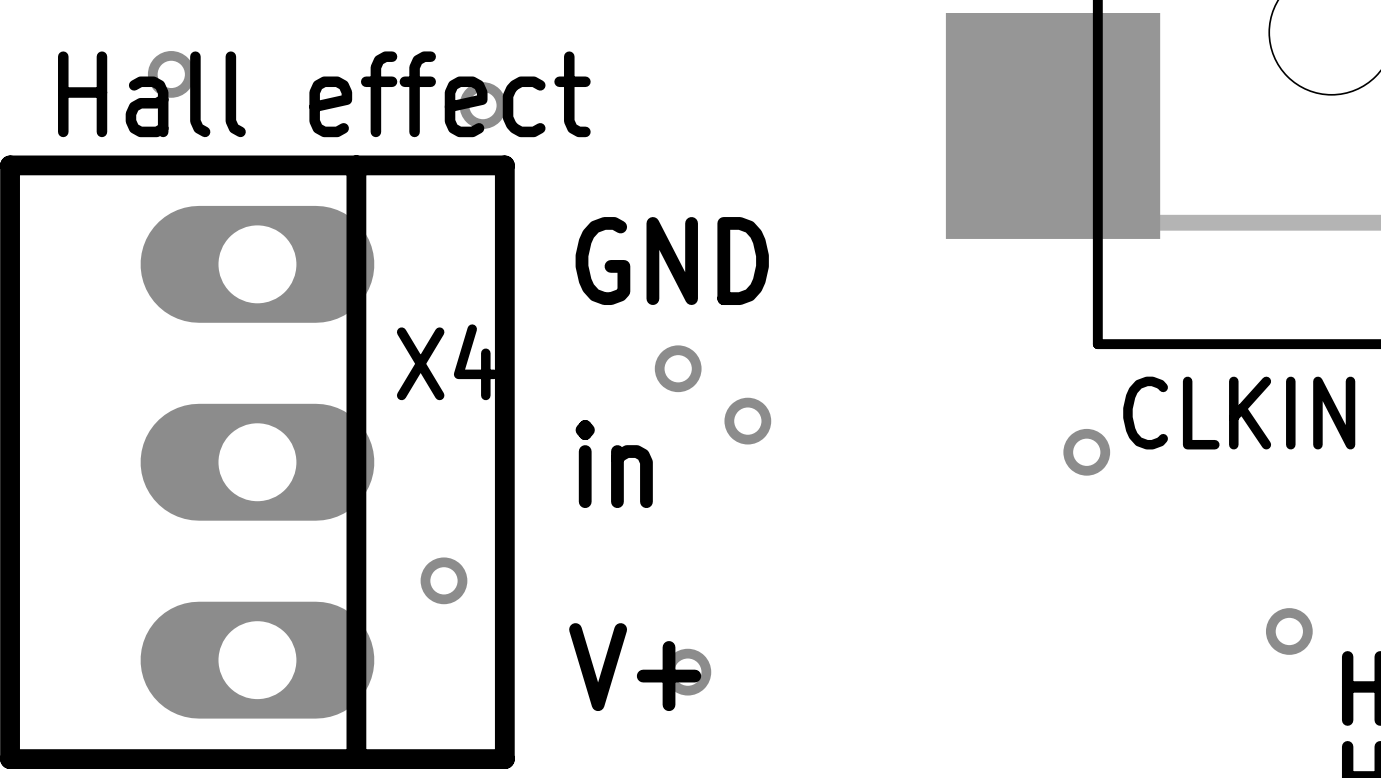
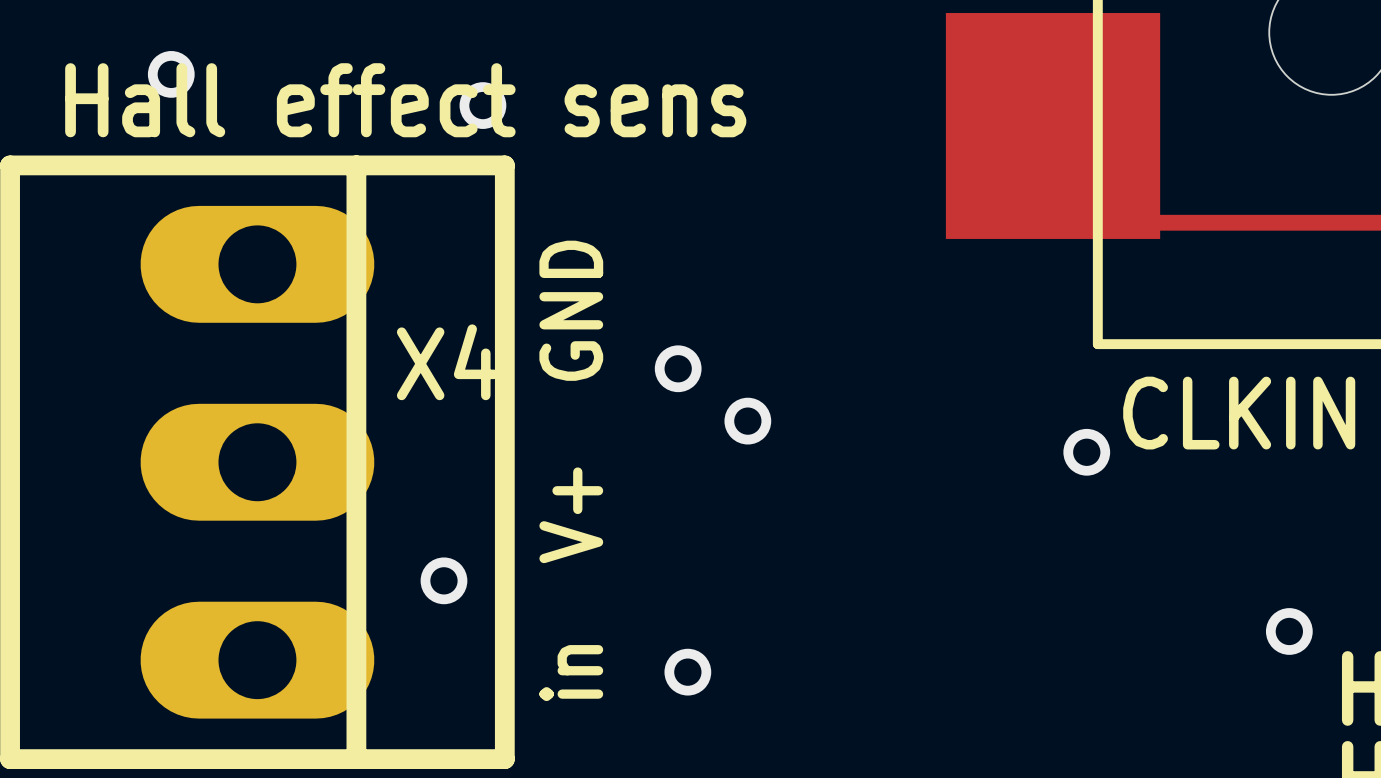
text: Hall effect (324, 94) -> Hall effect sens (405, 100)
text: GND (672, 261) -> none
text: in (614, 464) -> none
text: V+ (635, 667) -> in V+ GND (571, 470)

